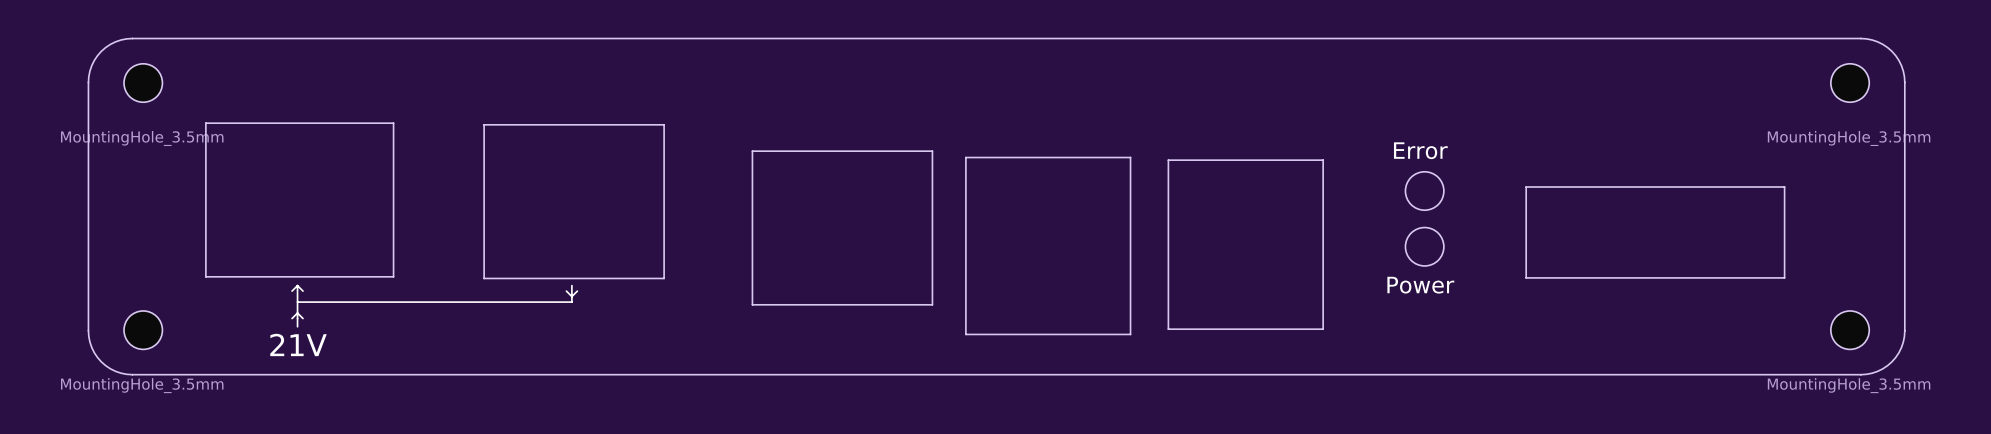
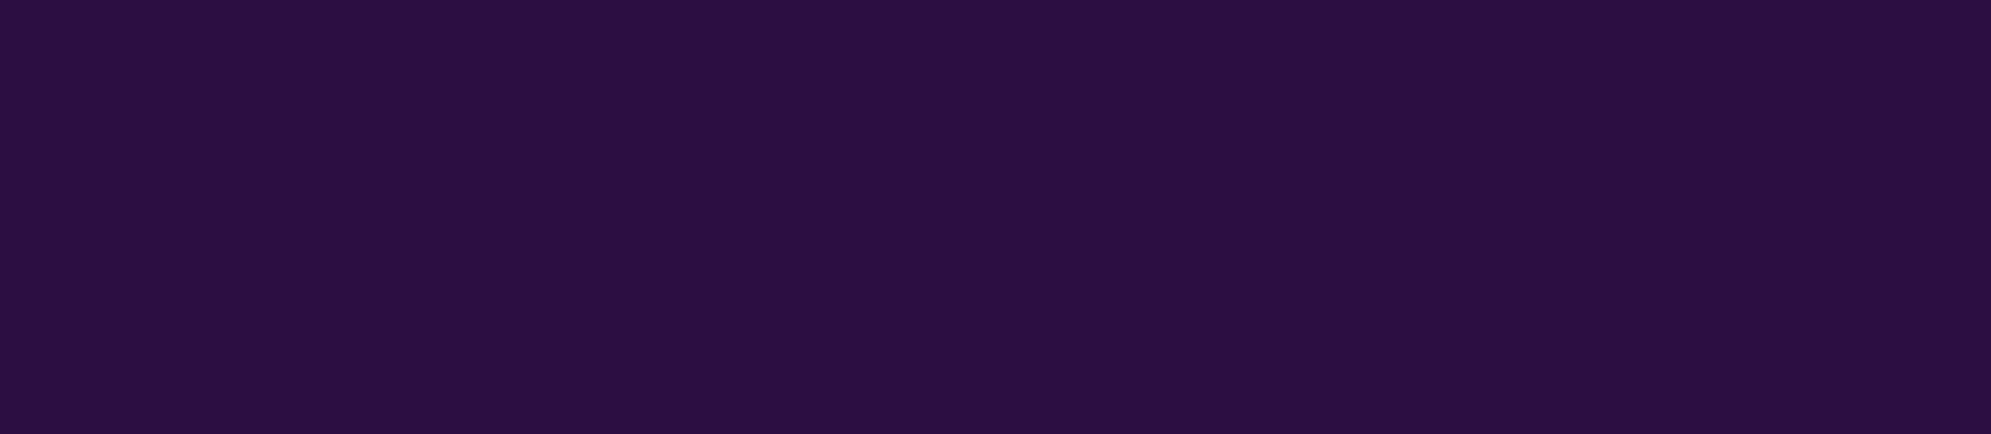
part: MountingHole_3.5mm (143, 83) -> none
part: MountingHole_3.5mm (1850, 83) -> none
board edge: (205, 123) (393, 123) (393, 276) (205, 276) (205, 123) -> none
board edge: (484, 124) (664, 124) (664, 278) (484, 278) (484, 124) -> none
text: Error (1420, 150) -> none
board edge: (752, 151) (932, 151) (932, 304) (752, 304) (752, 151) -> none
board edge: (965, 157) (965, 334) (1130, 334) (1130, 157) (965, 157) -> none
board edge: (1168, 160) (1323, 160) (1323, 329) (1168, 329) (1168, 160) -> none
round board edge: [1404, 171, 1445, 211] -> none
board edge: (1526, 186) (1526, 277) (1784, 277) (1784, 186) (1526, 186) -> none
round board edge: [1404, 226, 1445, 267] -> none
line: (297, 285) (292, 291) -> none
line: (297, 285) (303, 291) -> none
line: (297, 285) (297, 326) -> none
line: (571, 285) (571, 302) (297, 302) -> none
text: Power (1420, 285) -> none
line: (566, 291) (571, 296) (577, 291) -> none
line: (292, 318) (297, 313) (303, 318) -> none
part: MountingHole_3.5mm (143, 330) -> none
part: MountingHole_3.5mm (1850, 330) -> none
text: 21V (298, 344) -> none
board edge: (132, 374) (1866, 374) (1882, 368) (1891, 361) (1898, 352) (1904, 336) (1904, 76) (1898, 60) (1887, 47) (1872, 40) (1860, 38) (126, 38) (115, 41) (101, 51) (91, 65) (88, 76) (88, 330) (91, 347) (101, 361) (115, 371) (132, 374) -> none

